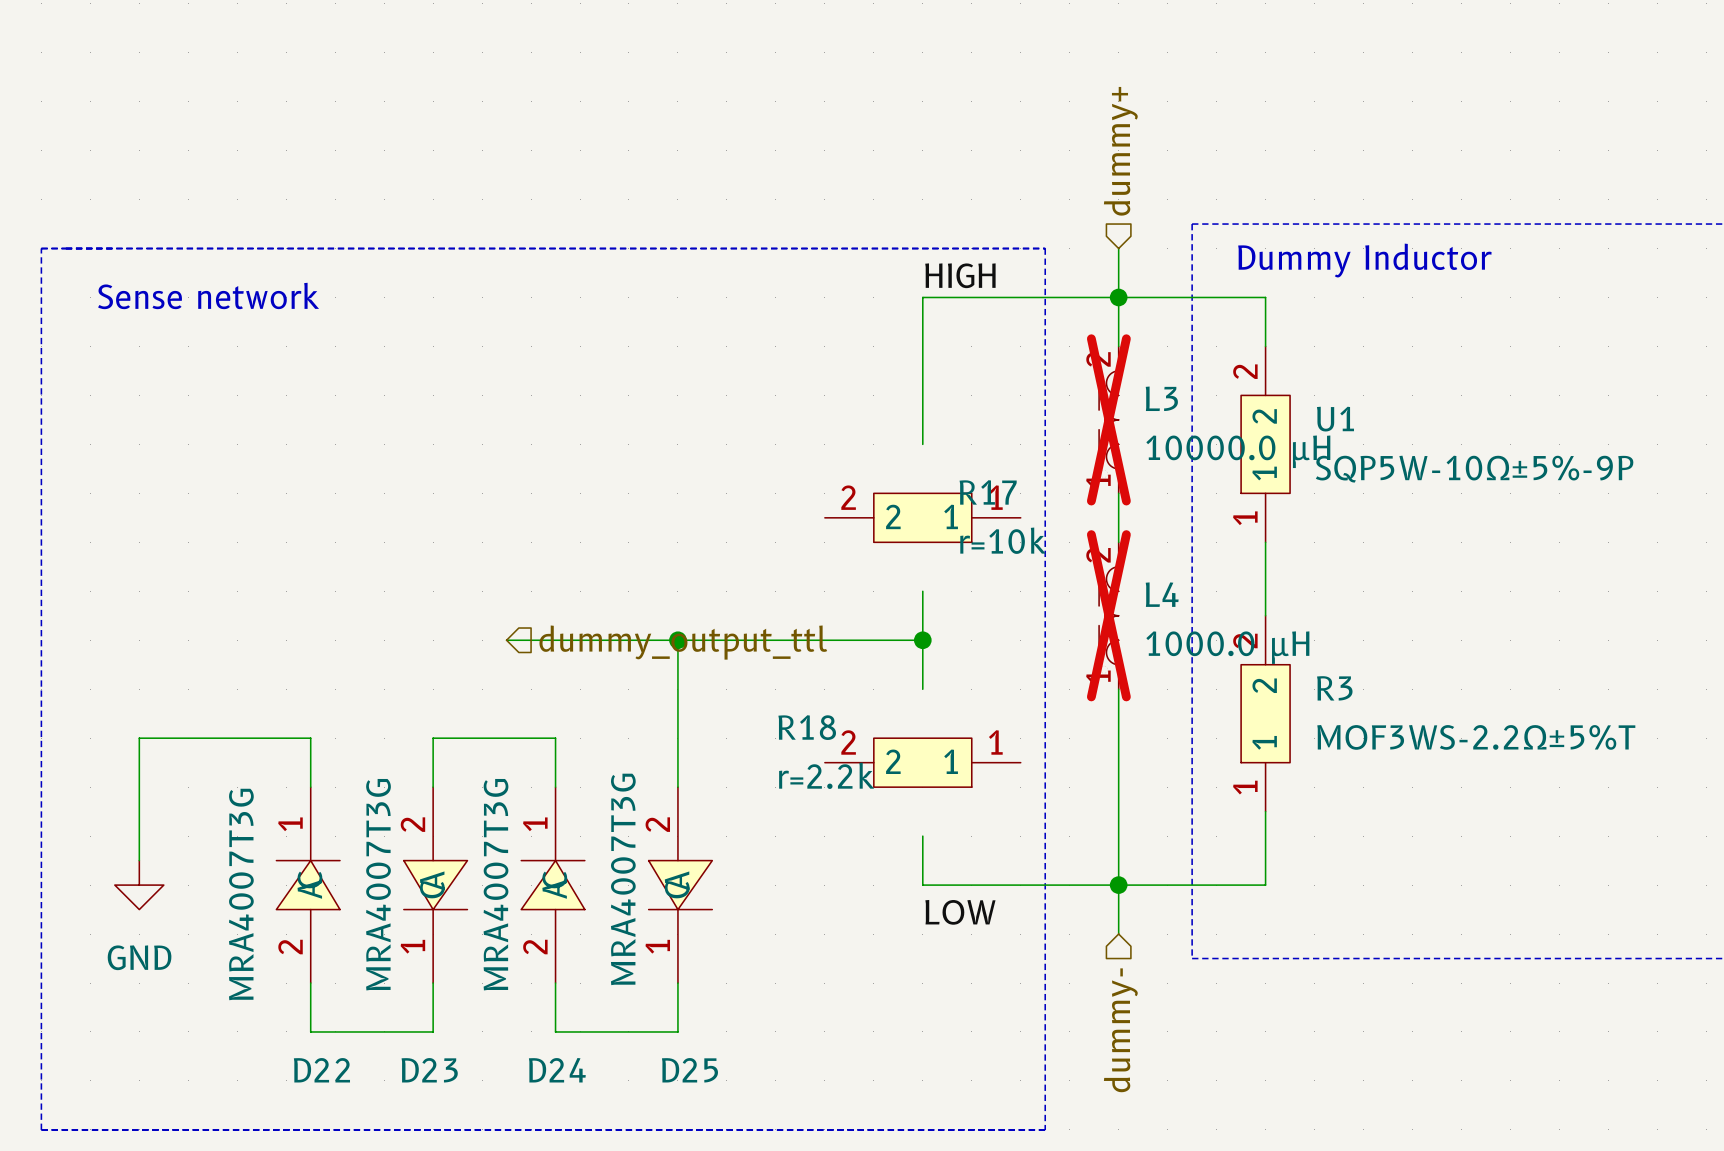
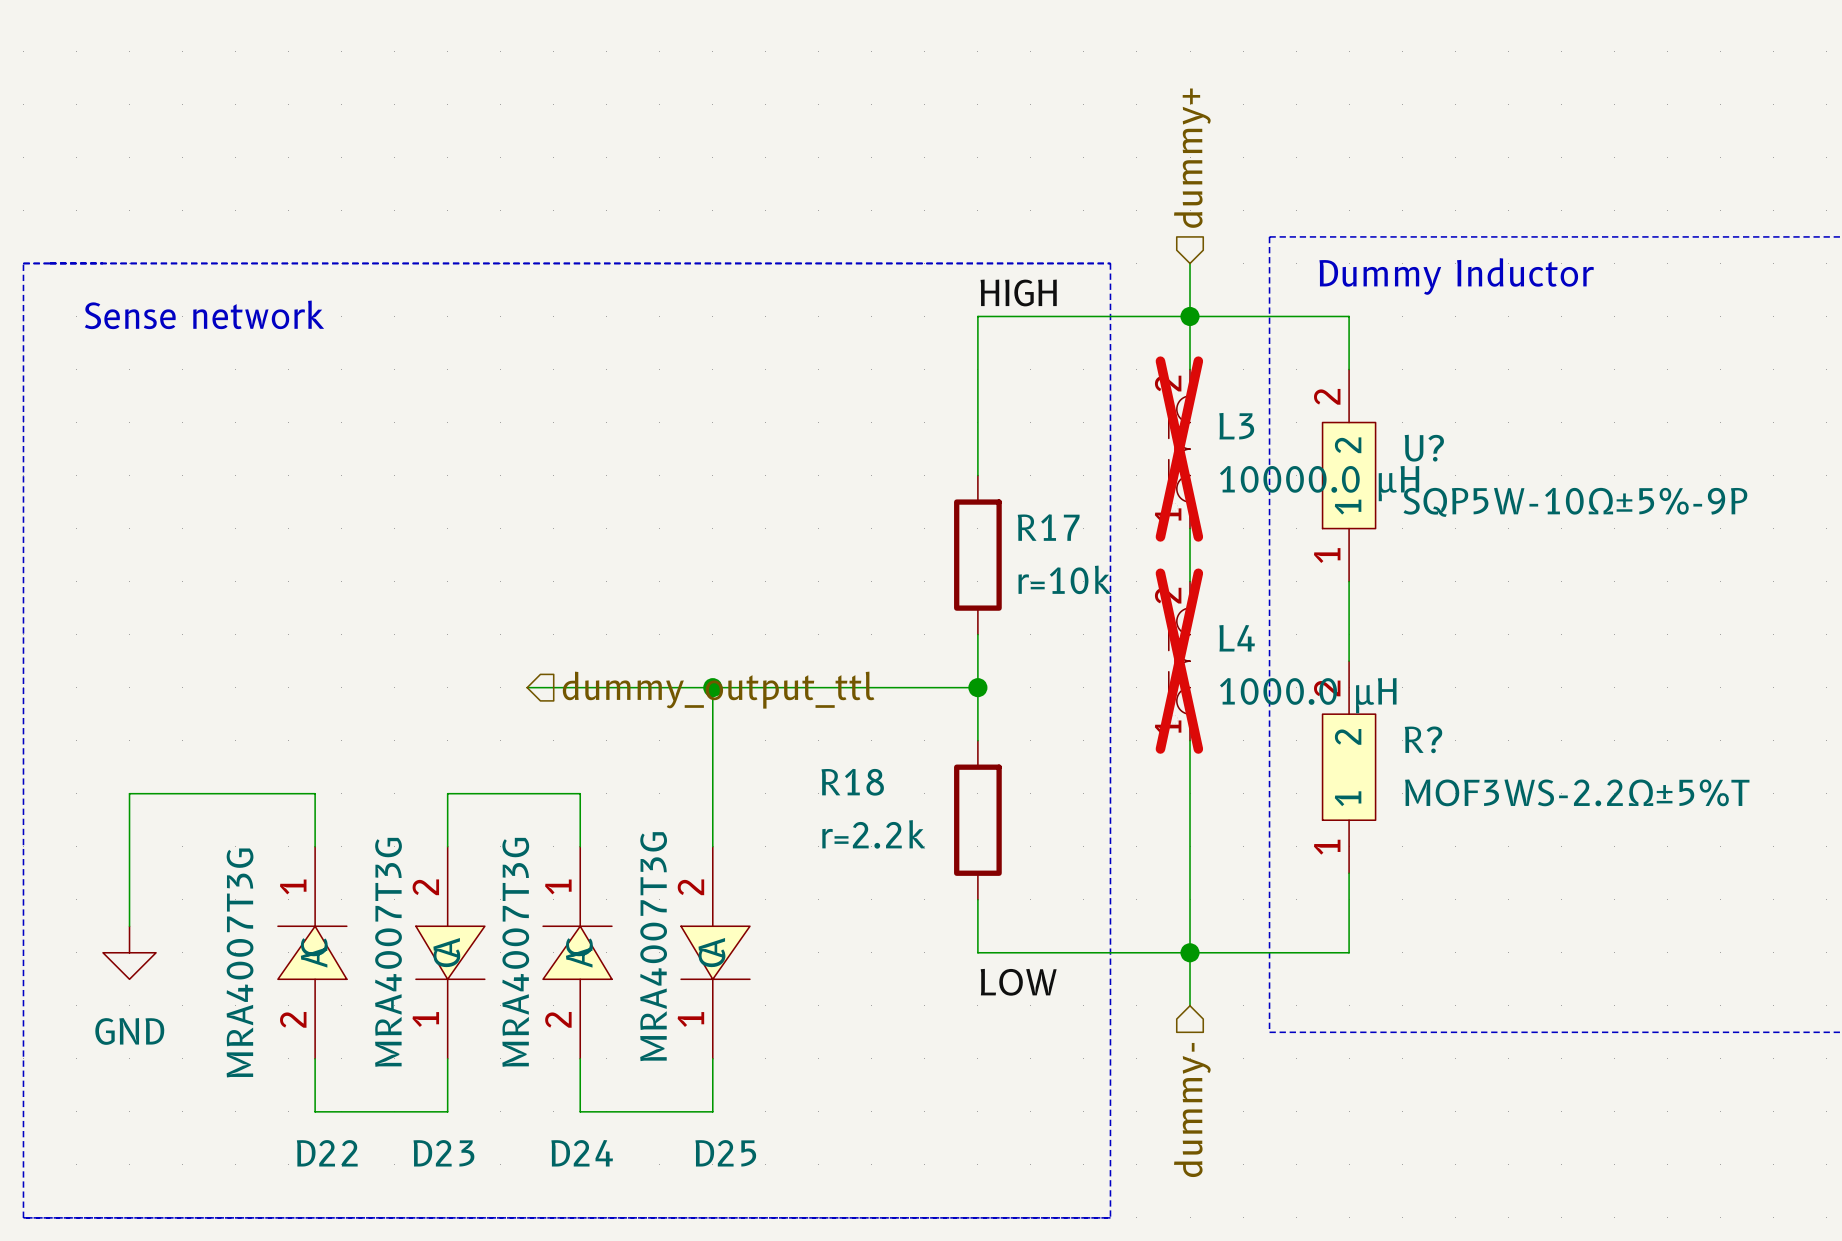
U1 name: U1 (1335, 419) -> U? (1424, 448)
R17 symbol: [824, 493, 1021, 543] -> [954, 475, 1002, 635]
R3 name: R3 (1334, 688) -> R? (1423, 739)
R18 symbol: [824, 738, 1021, 788] -> [954, 740, 1002, 900]

